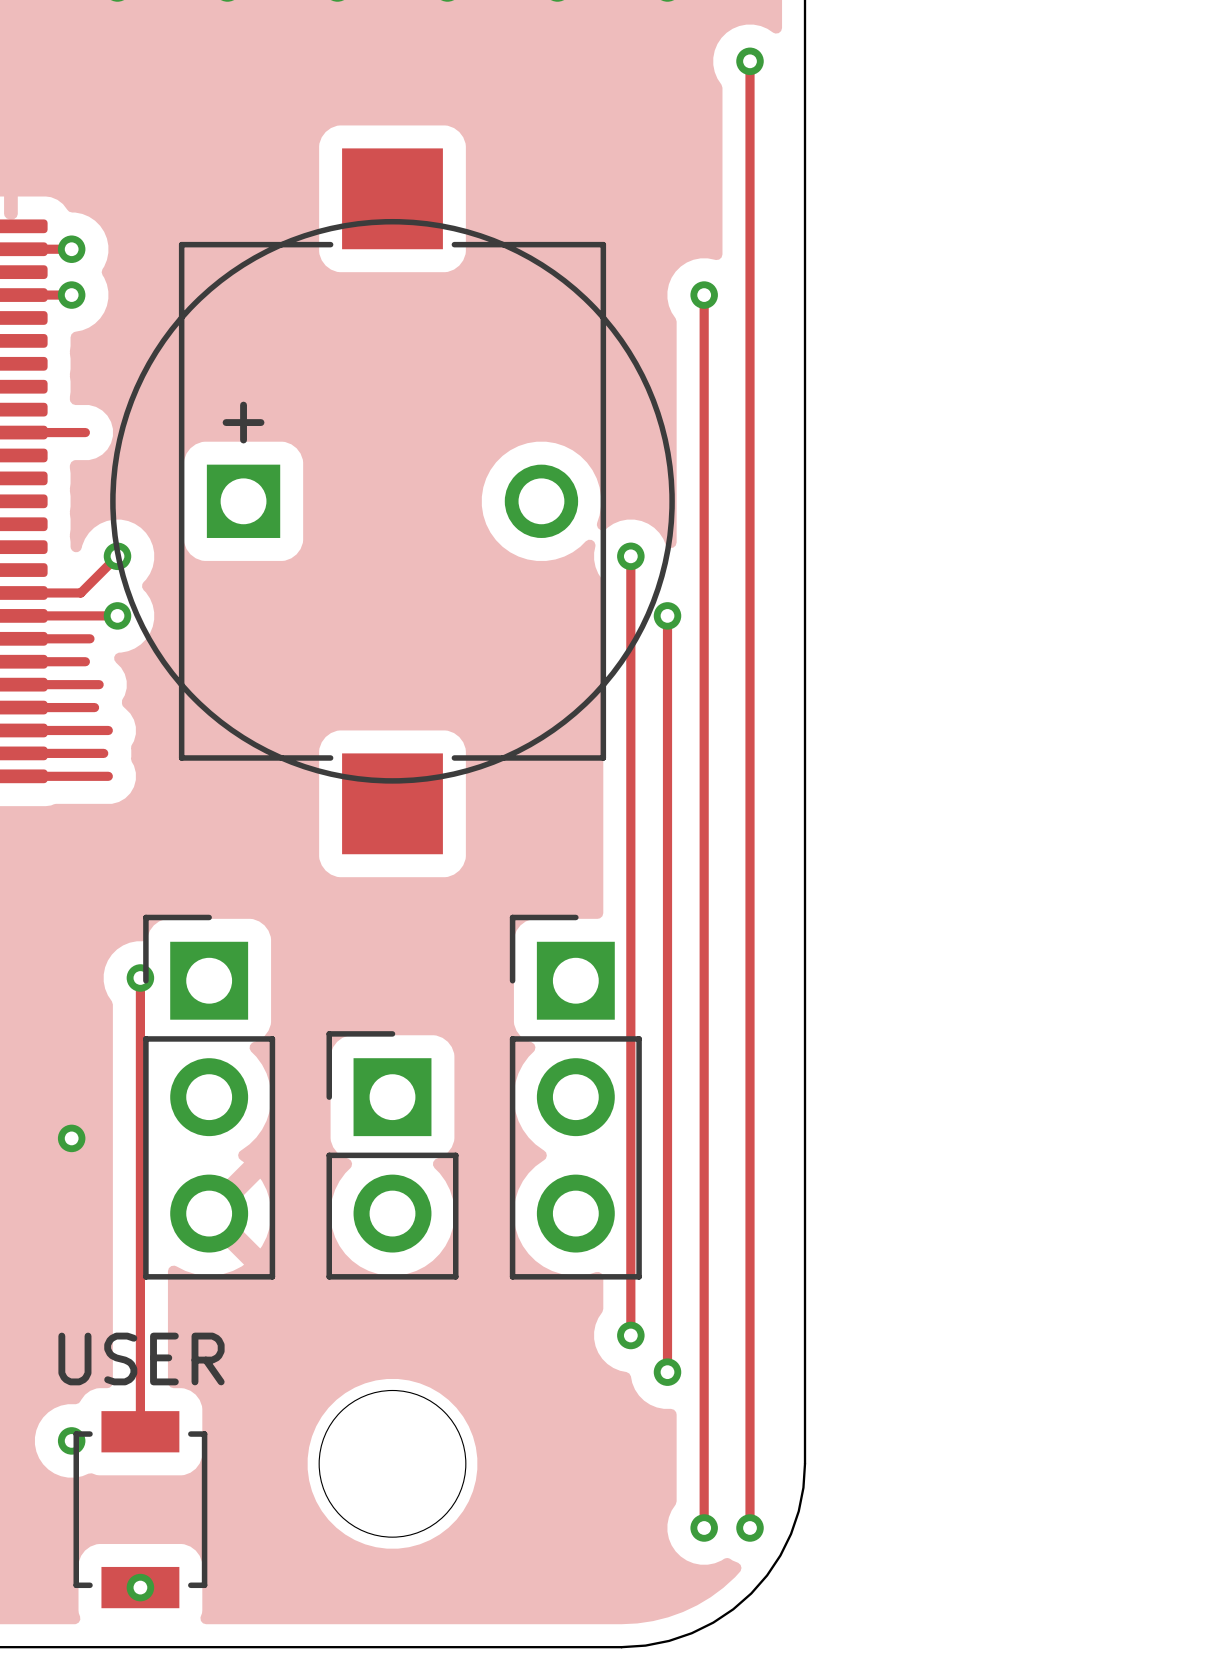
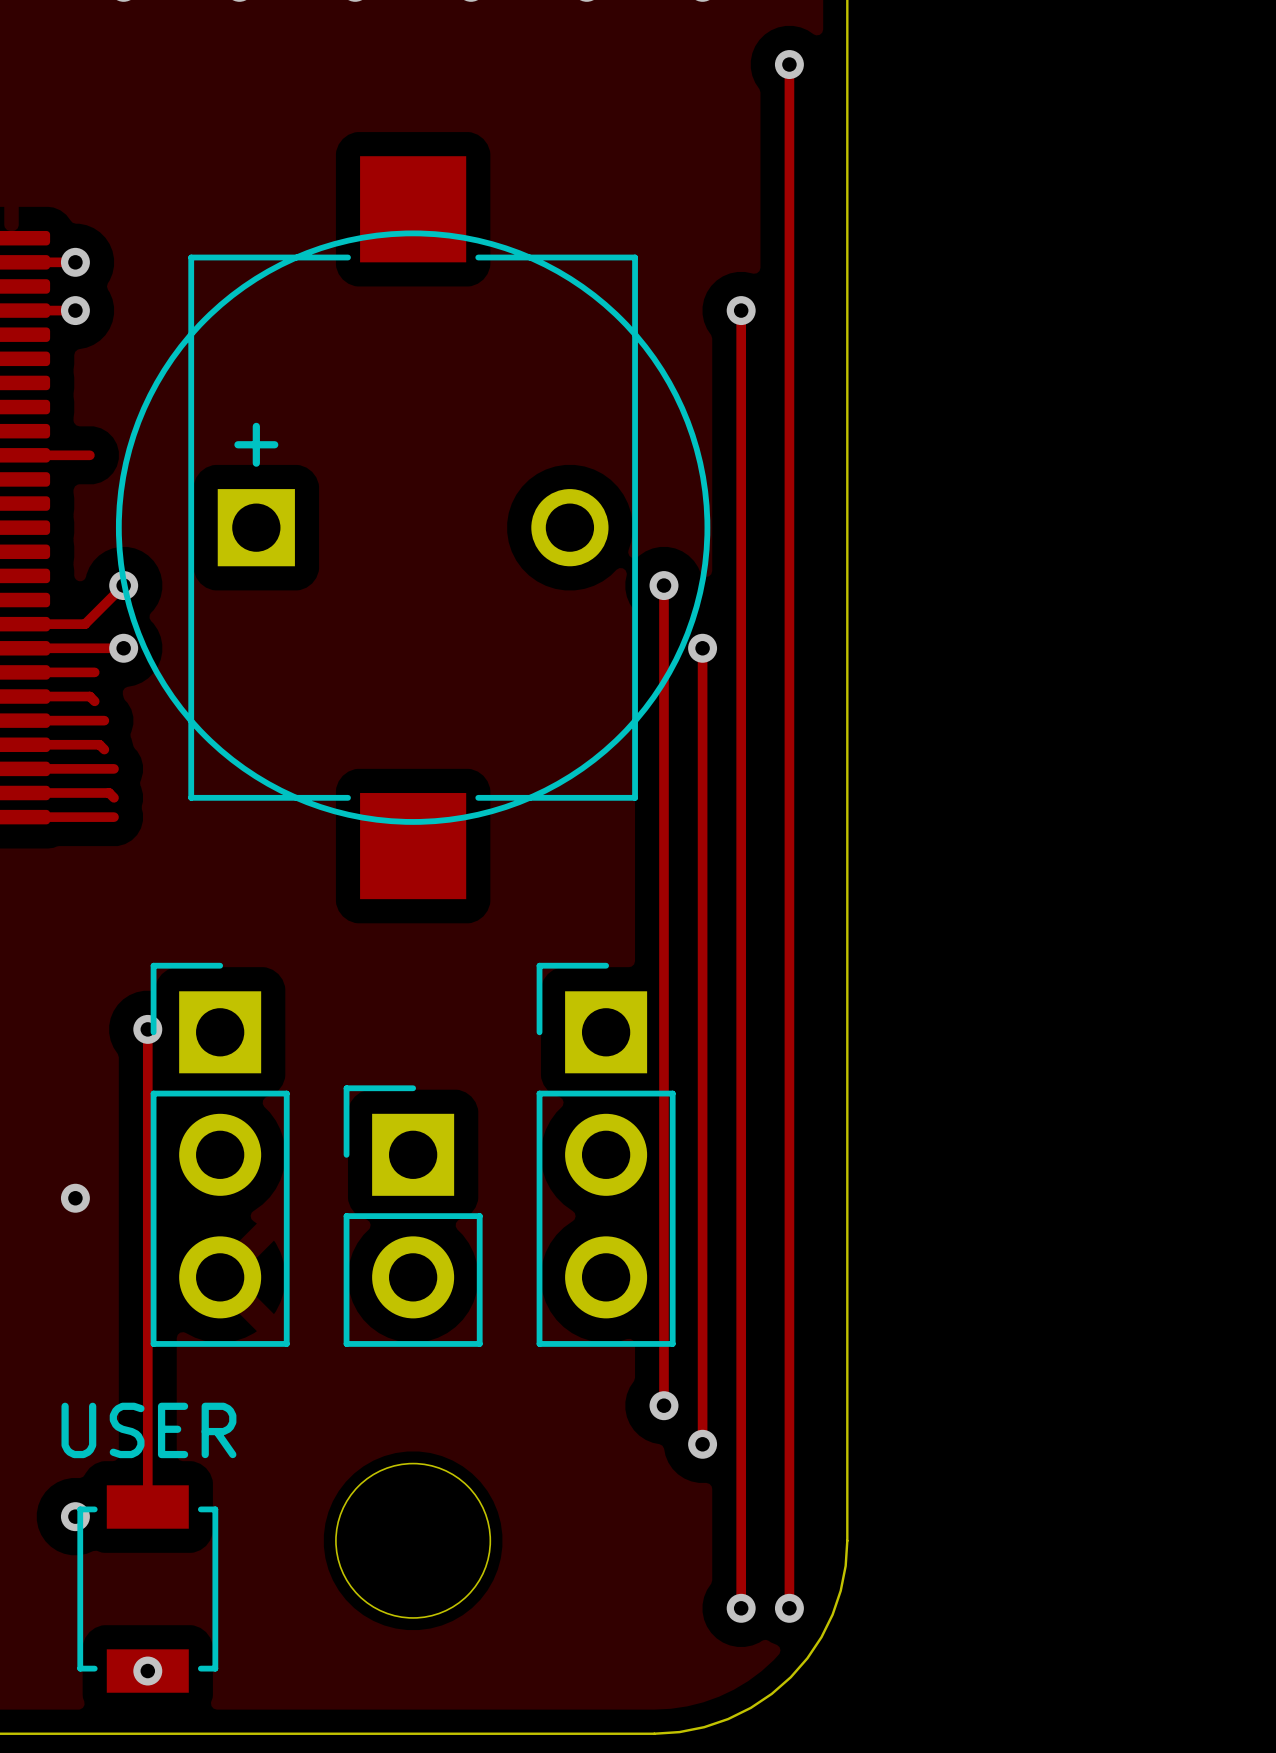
track: none -> (89, 696) (94, 701)
track: none -> (99, 744) (104, 749)
track: none -> (109, 793) (114, 797)

